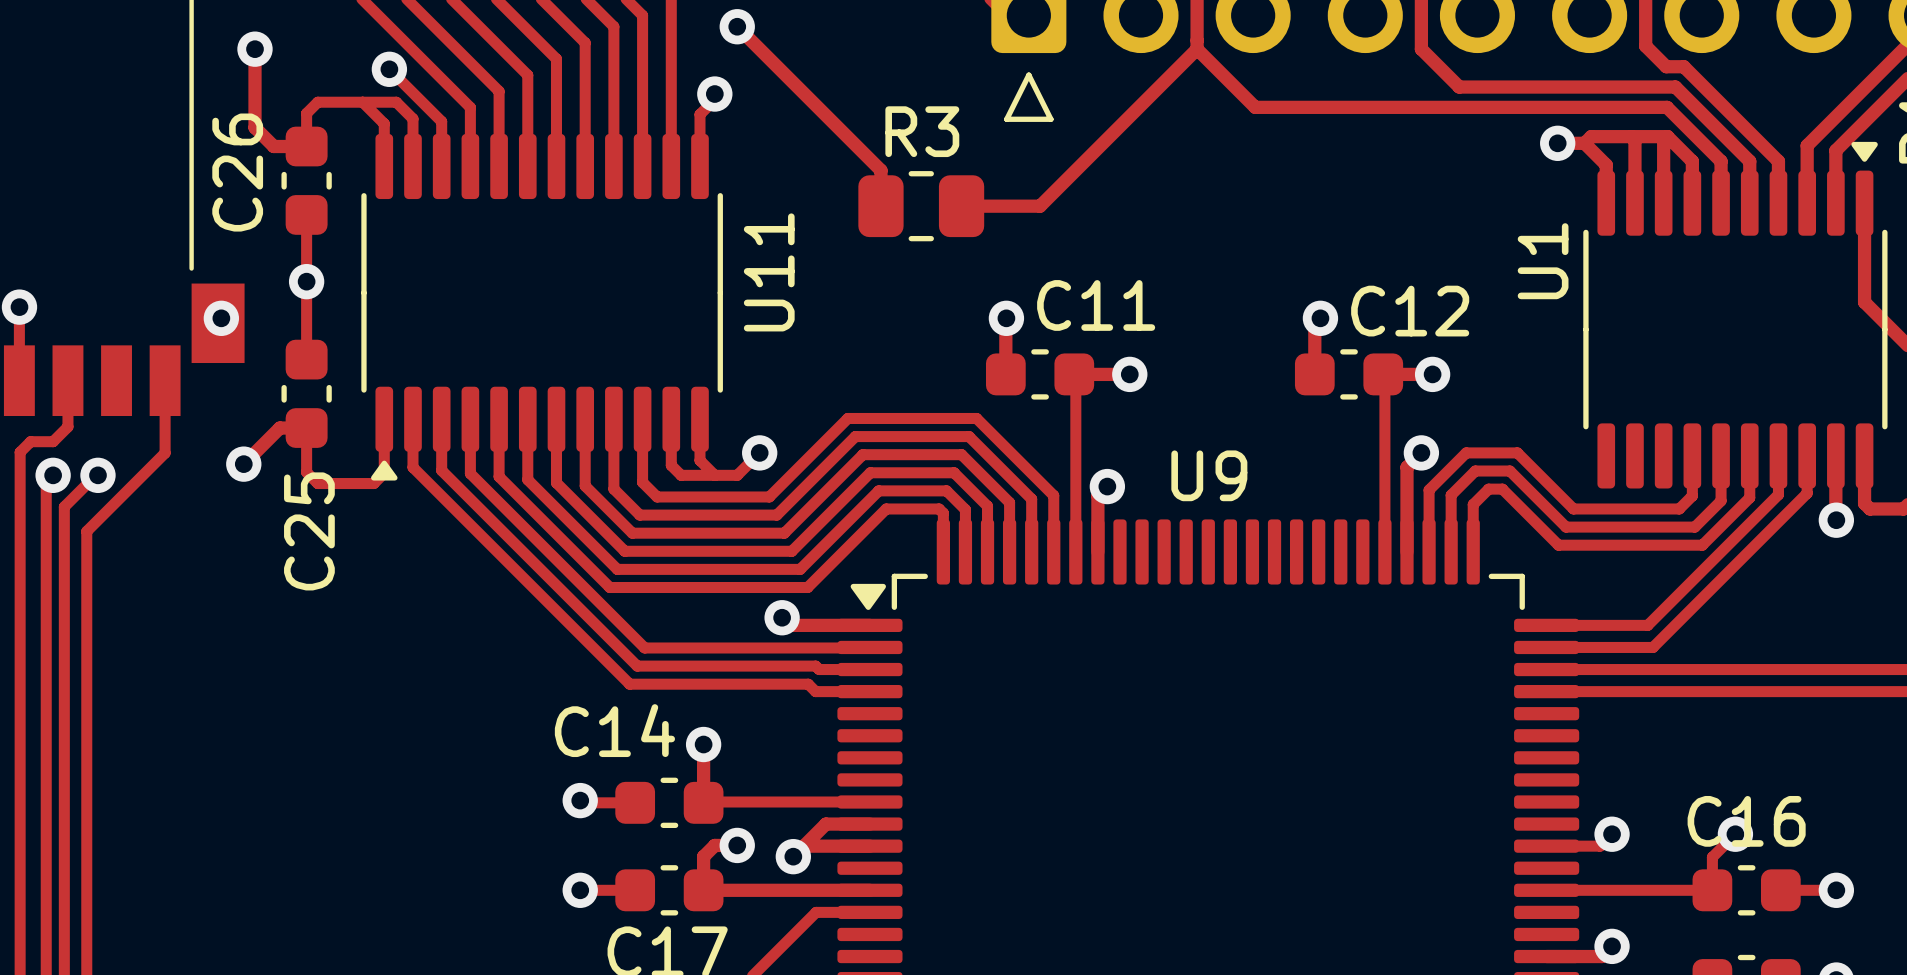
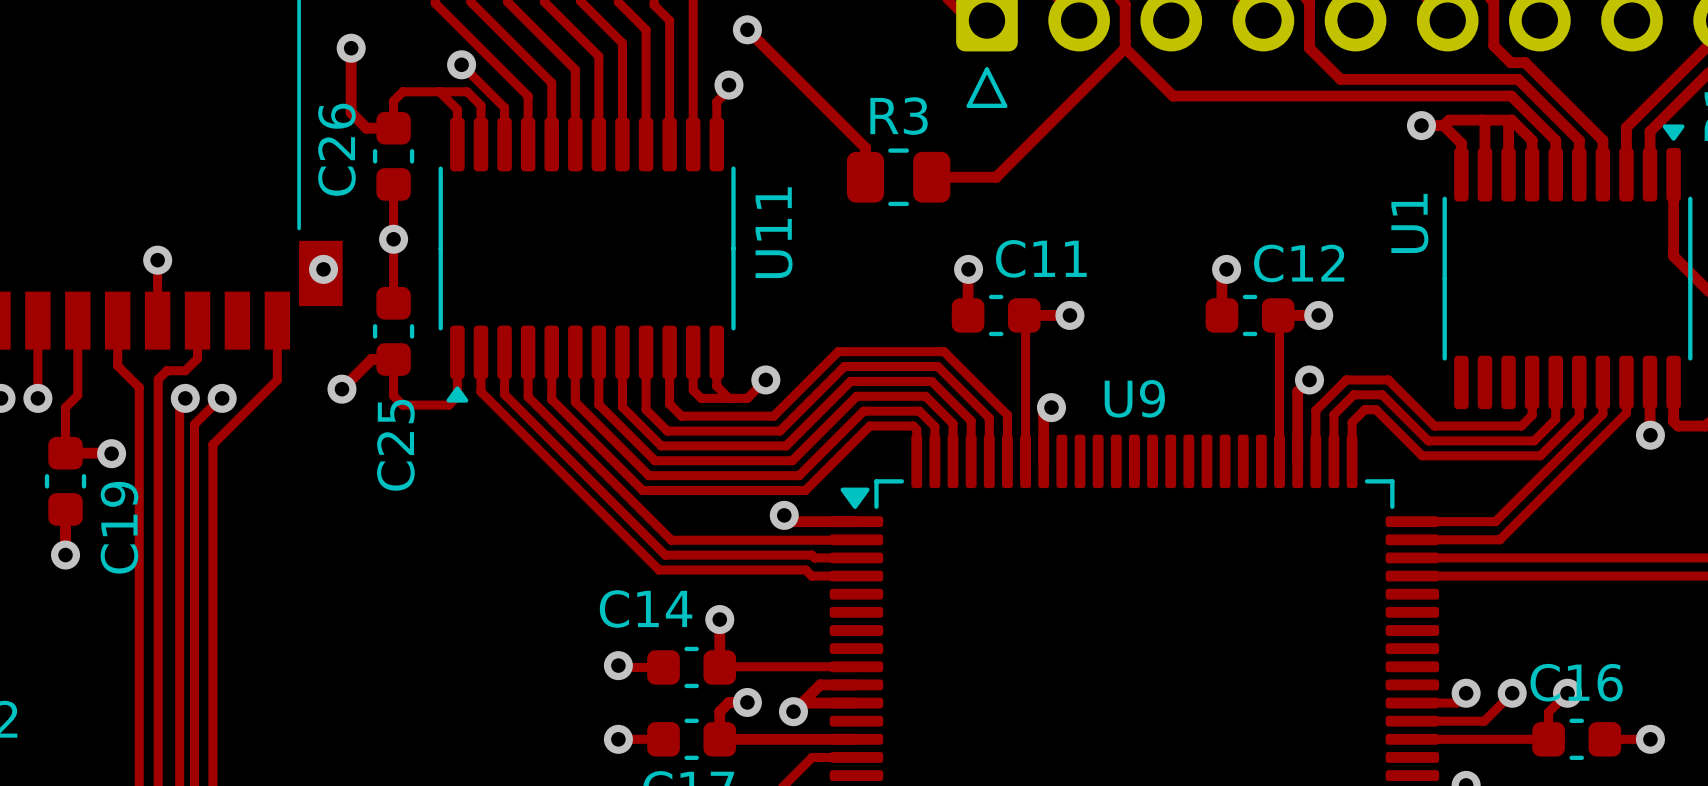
track: none -> (1512, 693) (1484, 721) (1412, 721)
via: none -> (1512, 693)

